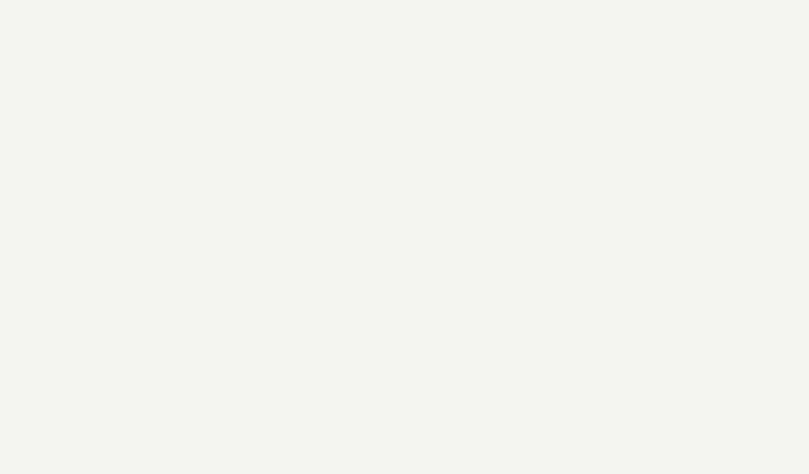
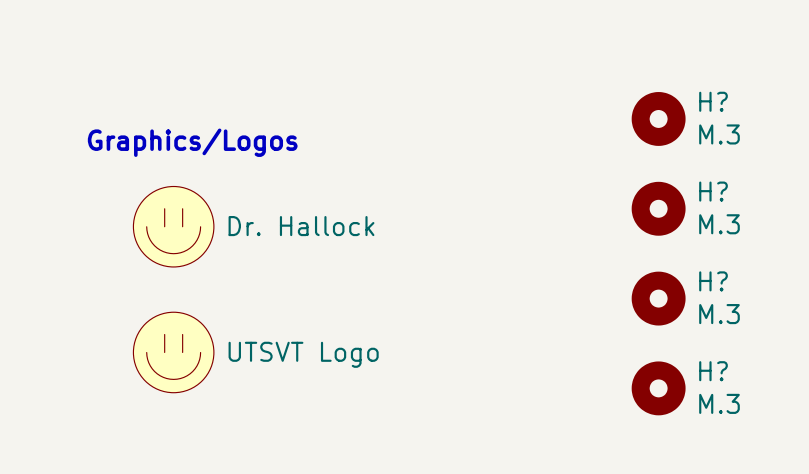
H?: none -> M.3 (658, 118)
text: none -> Graphics/Logos (192, 142)
H?: none -> M.3 (658, 208)
part: none -> Dr. Hallock (173, 226)
H?: none -> M.3 (658, 298)
part: none -> UTSVT Logo (173, 352)
H?: none -> M.3 (658, 388)

